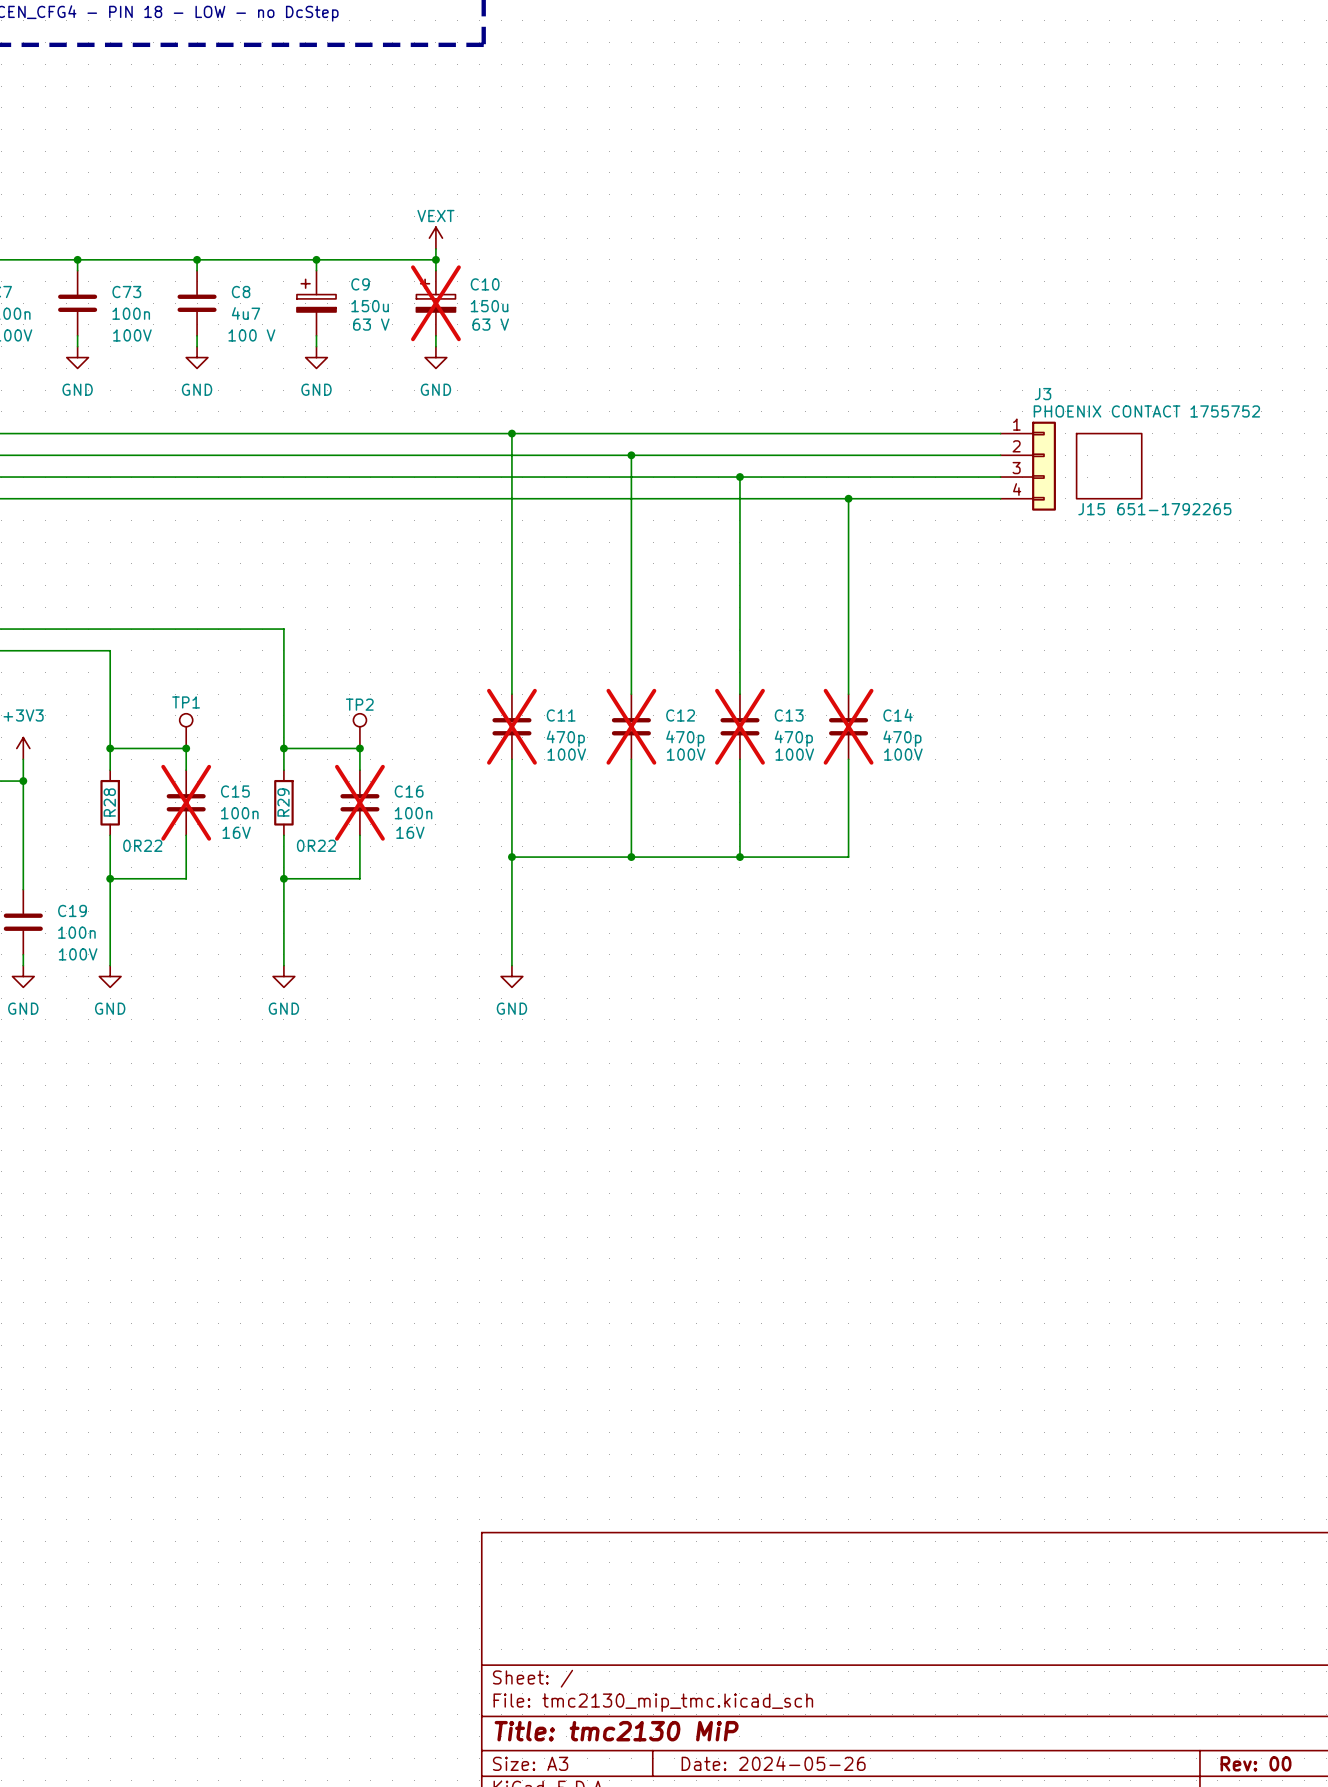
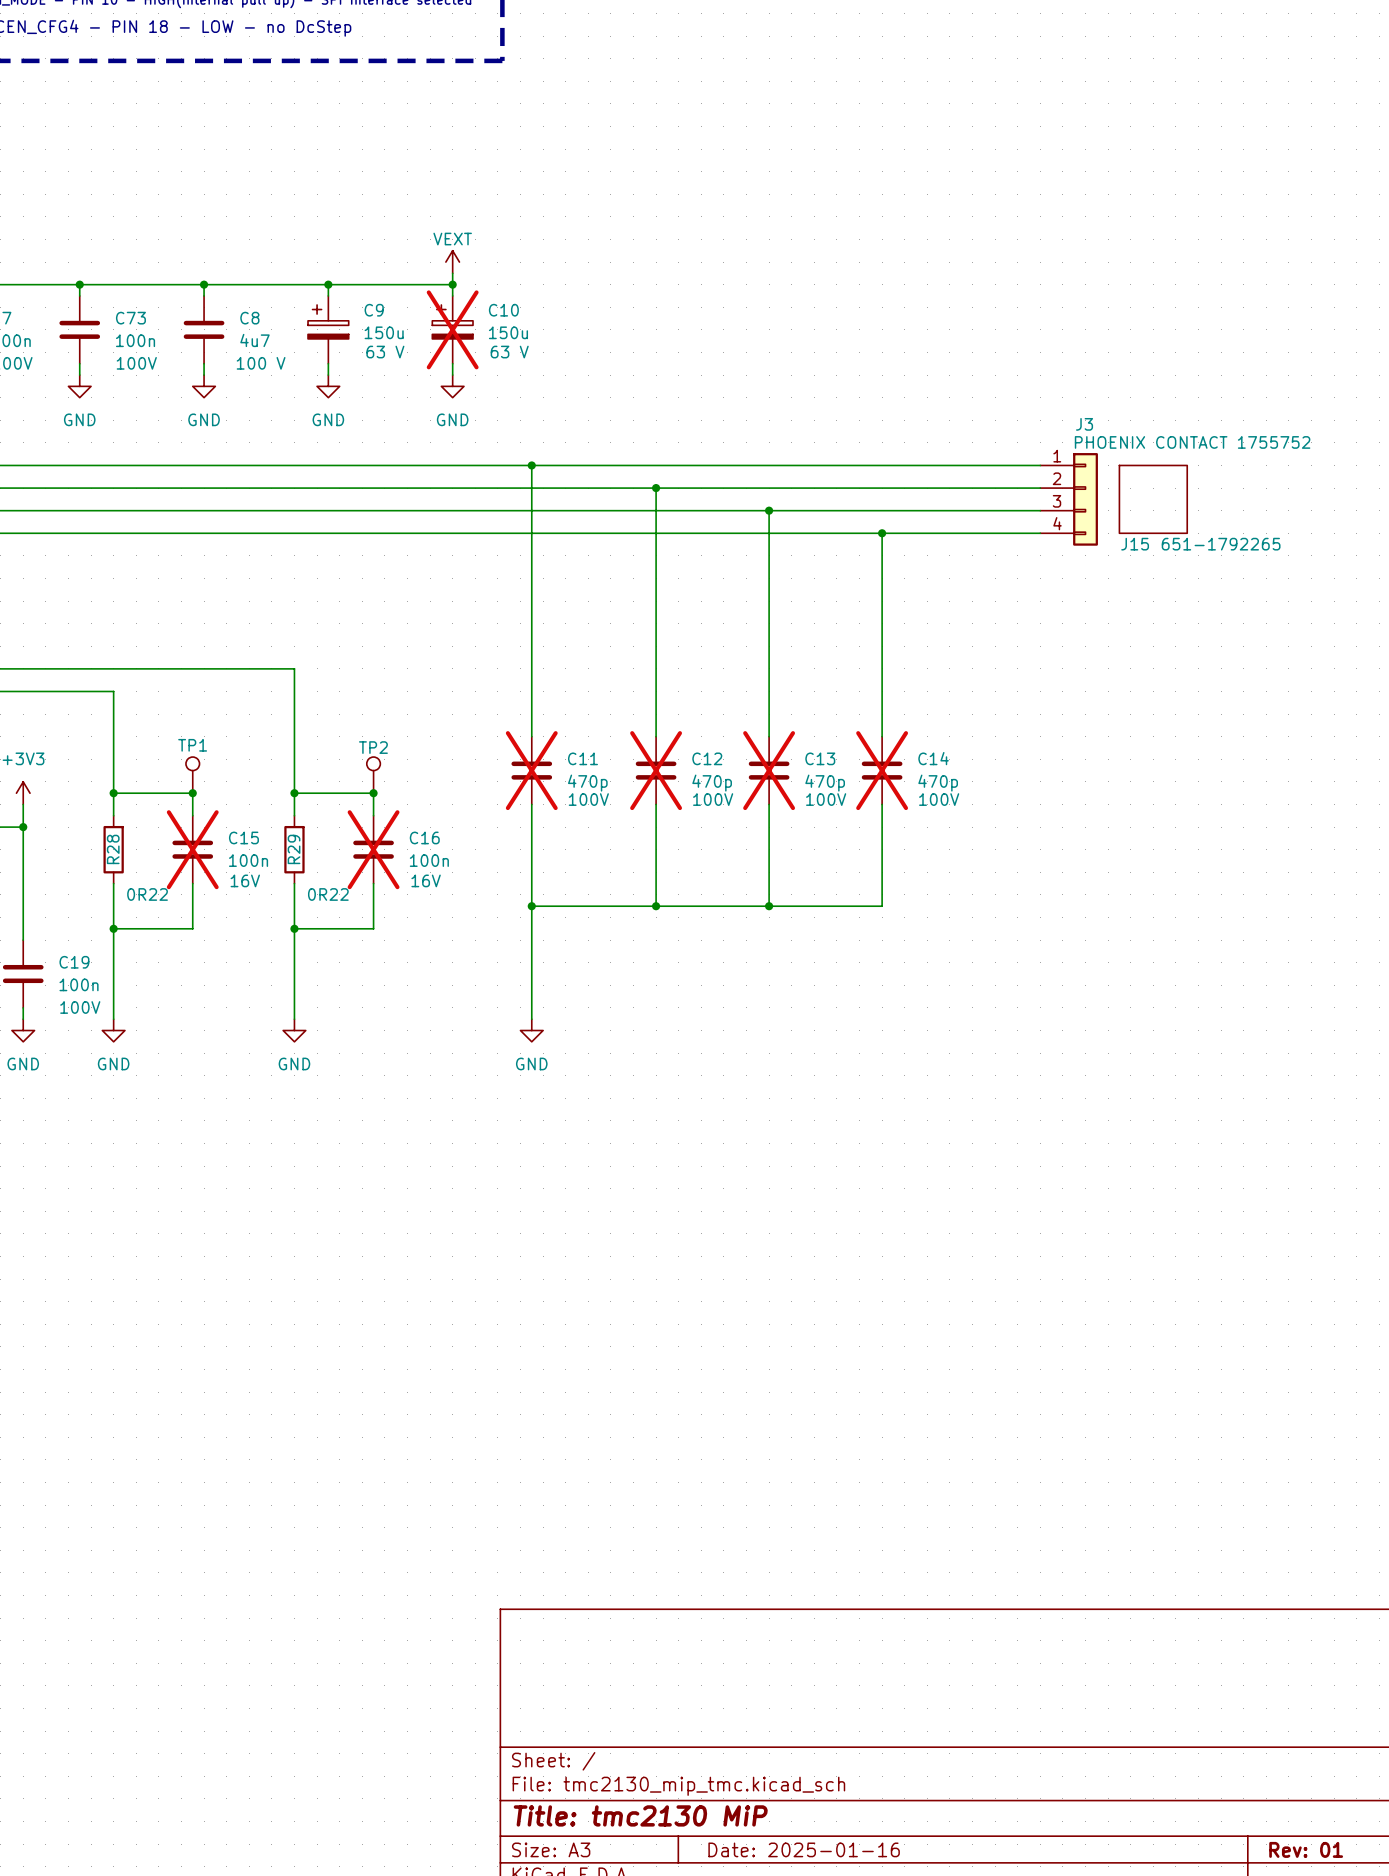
title block: Date: 2024-05-26 (773, 1763) -> Date: 2025-01-16 (804, 1849)
title block: Rev: 00 (1256, 1763) -> Rev: 01 (1306, 1849)

